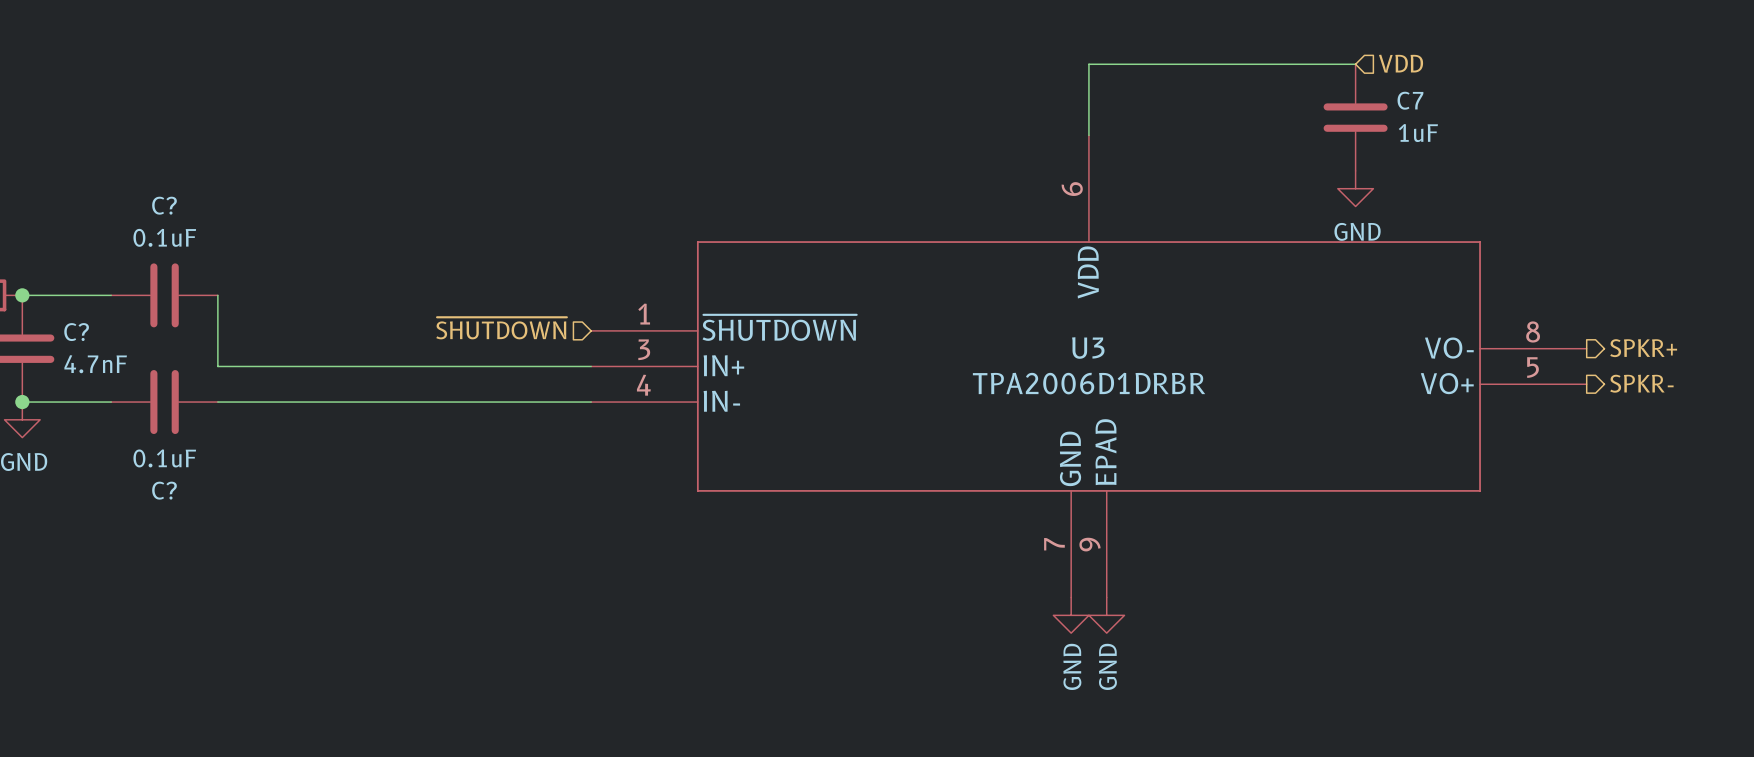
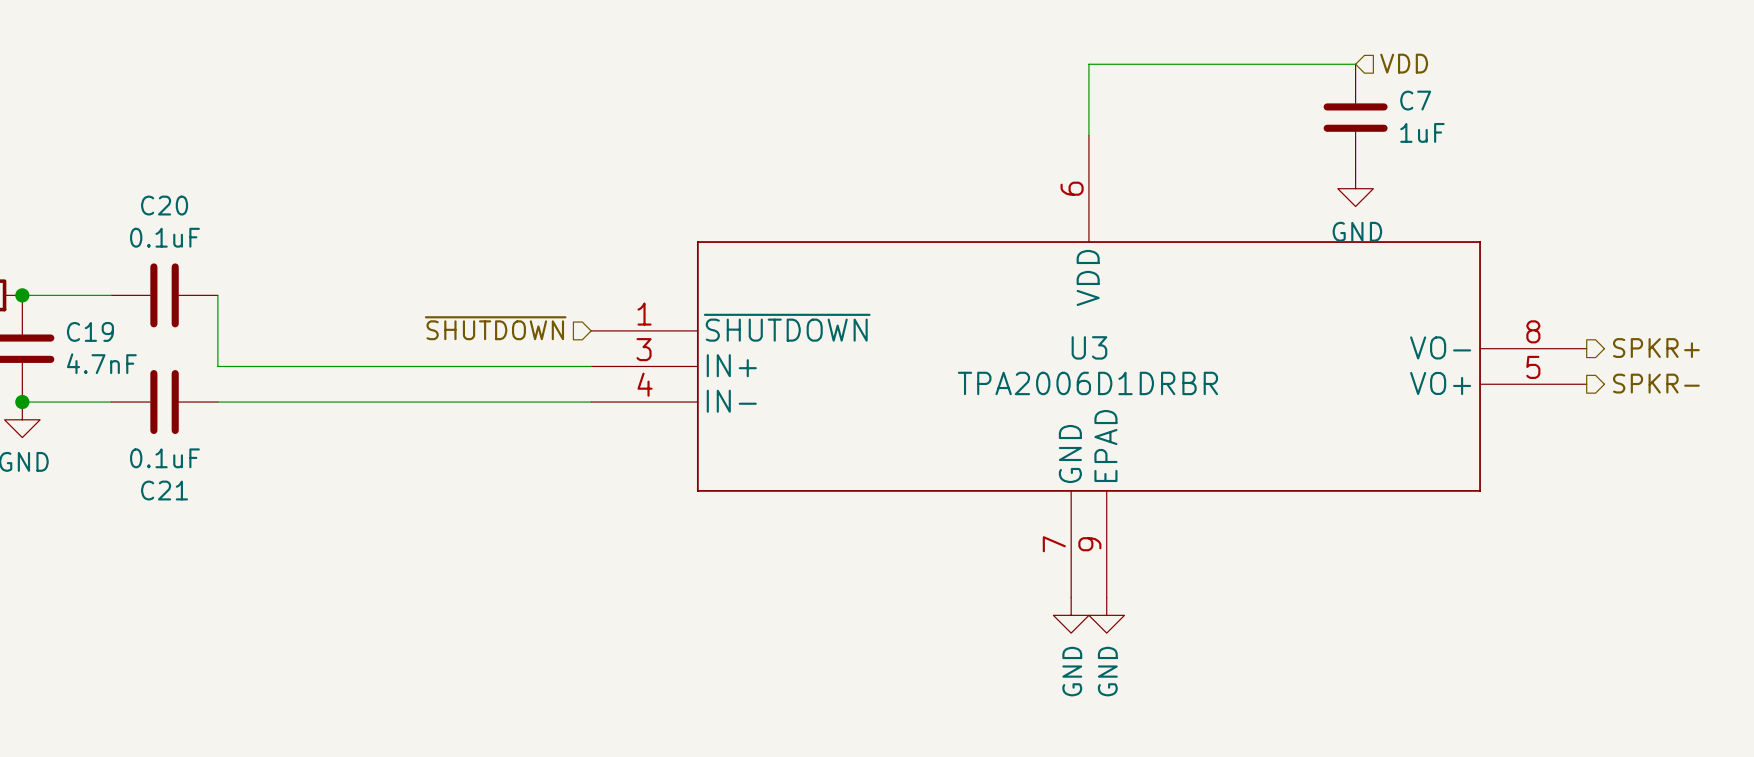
C? name: C? (164, 205) -> C20 (164, 205)
C? name: C? (76, 332) -> C19 (90, 331)
C? name: C? (164, 490) -> C21 (164, 490)

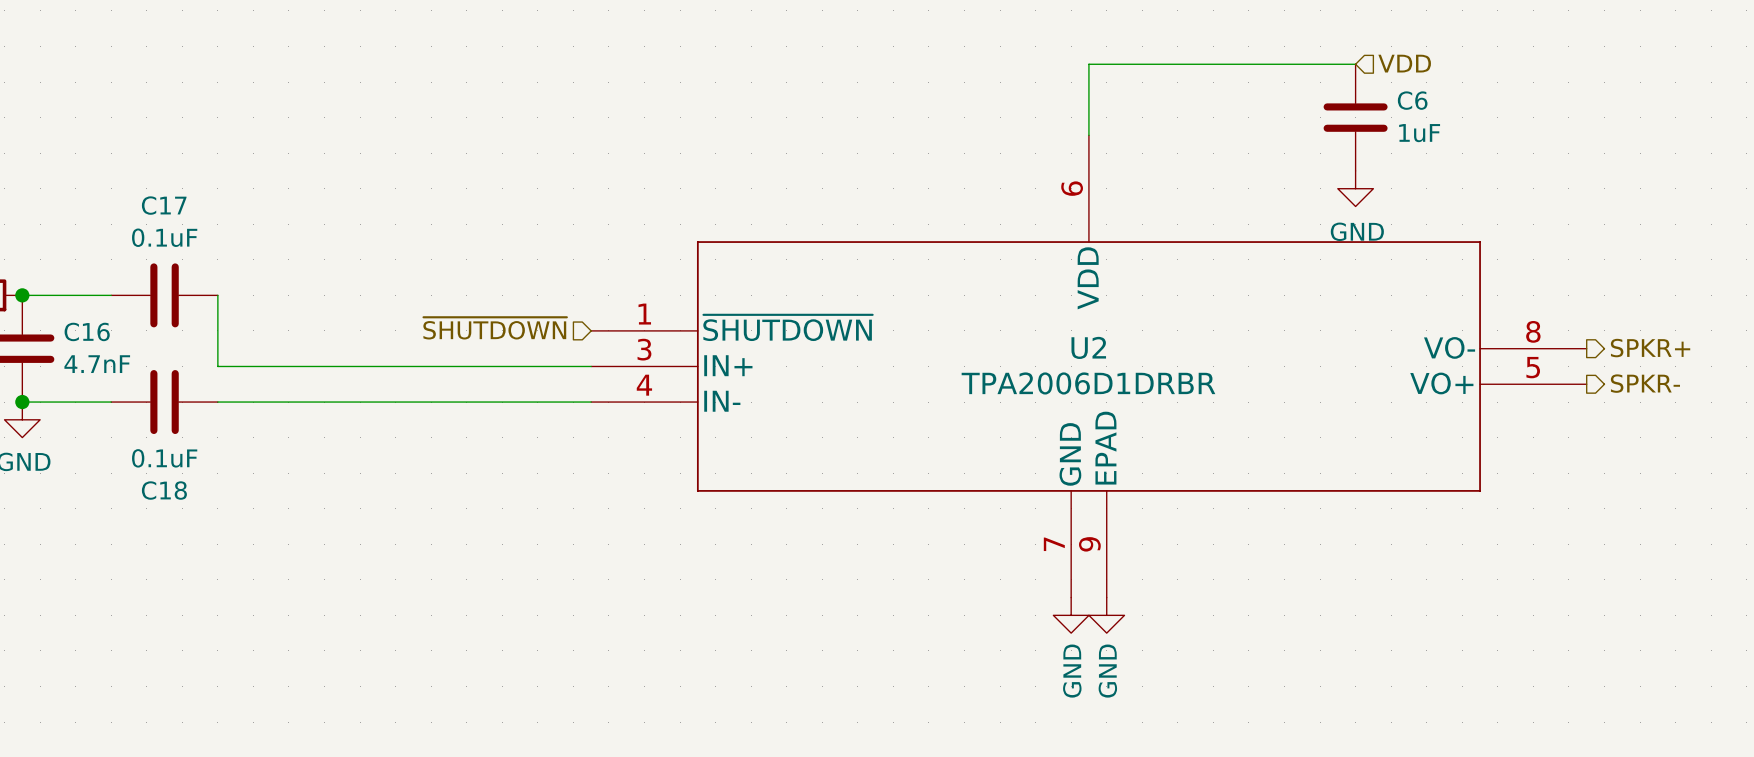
C7 name: C7 (1415, 100) -> C6 (1412, 100)
C20 name: C20 (164, 205) -> C17 (164, 205)
C19 name: C19 (90, 331) -> C16 (87, 331)
U3 name: U3 (1089, 347) -> U2 (1088, 347)
C21 name: C21 (164, 490) -> C18 (164, 490)

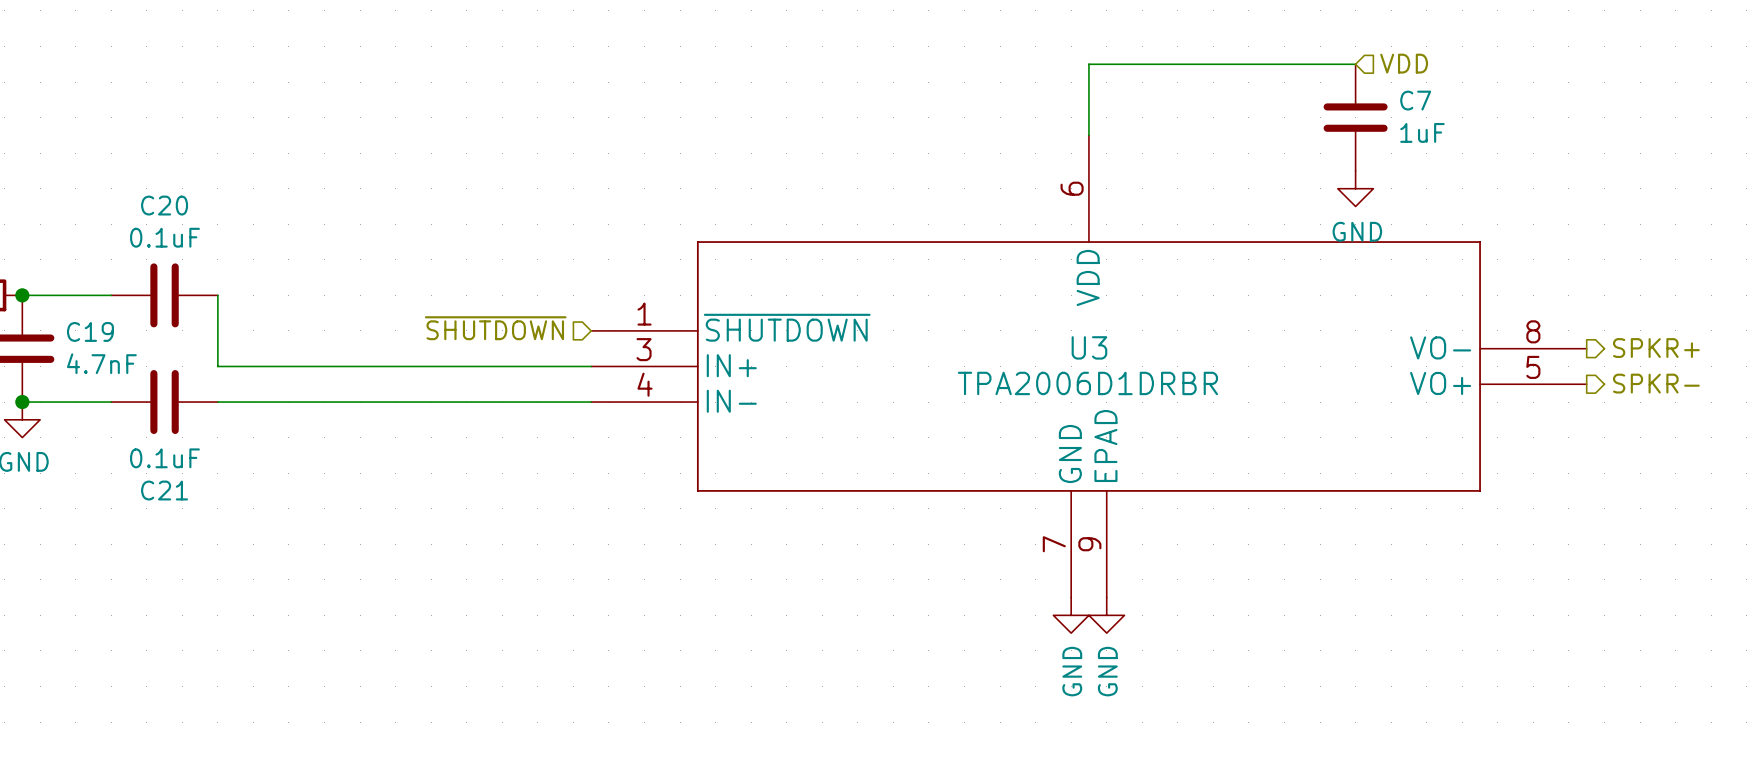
C6 name: C6 (1412, 100) -> C7 (1415, 100)
C17 name: C17 (164, 205) -> C20 (164, 205)
C16 name: C16 (87, 331) -> C19 (90, 331)
U2 name: U2 (1088, 347) -> U3 (1089, 347)
C18 name: C18 (164, 490) -> C21 (164, 490)

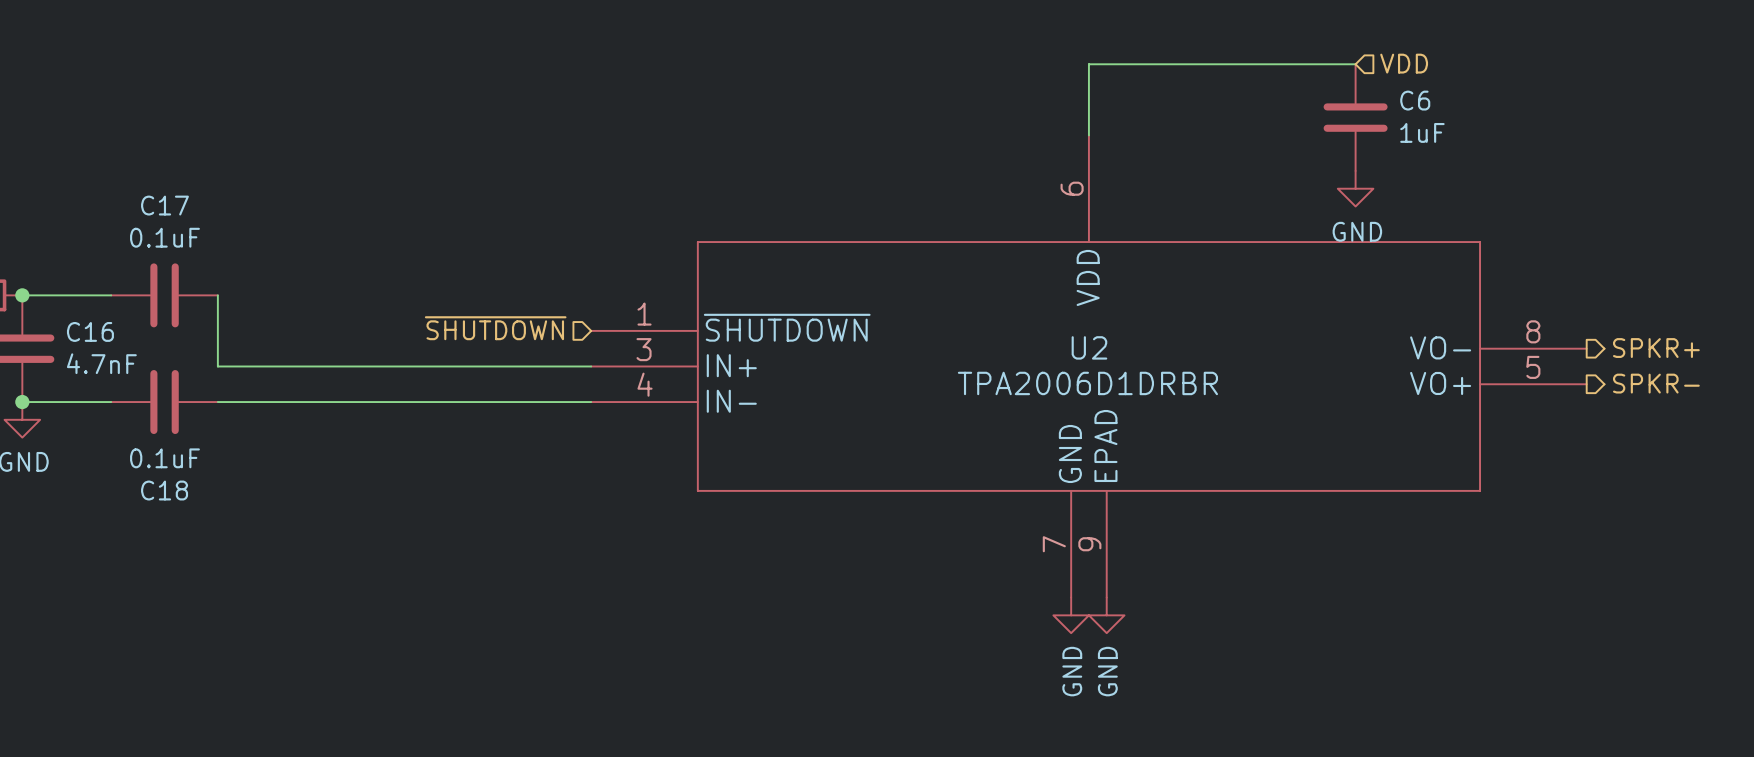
C7 name: C7 (1415, 100) -> C6 (1415, 100)
C20 name: C20 (164, 205) -> C17 (164, 205)
C19 name: C19 (90, 331) -> C16 (90, 331)
U3 name: U3 (1089, 347) -> U2 (1089, 347)
C21 name: C21 (164, 490) -> C18 (164, 490)

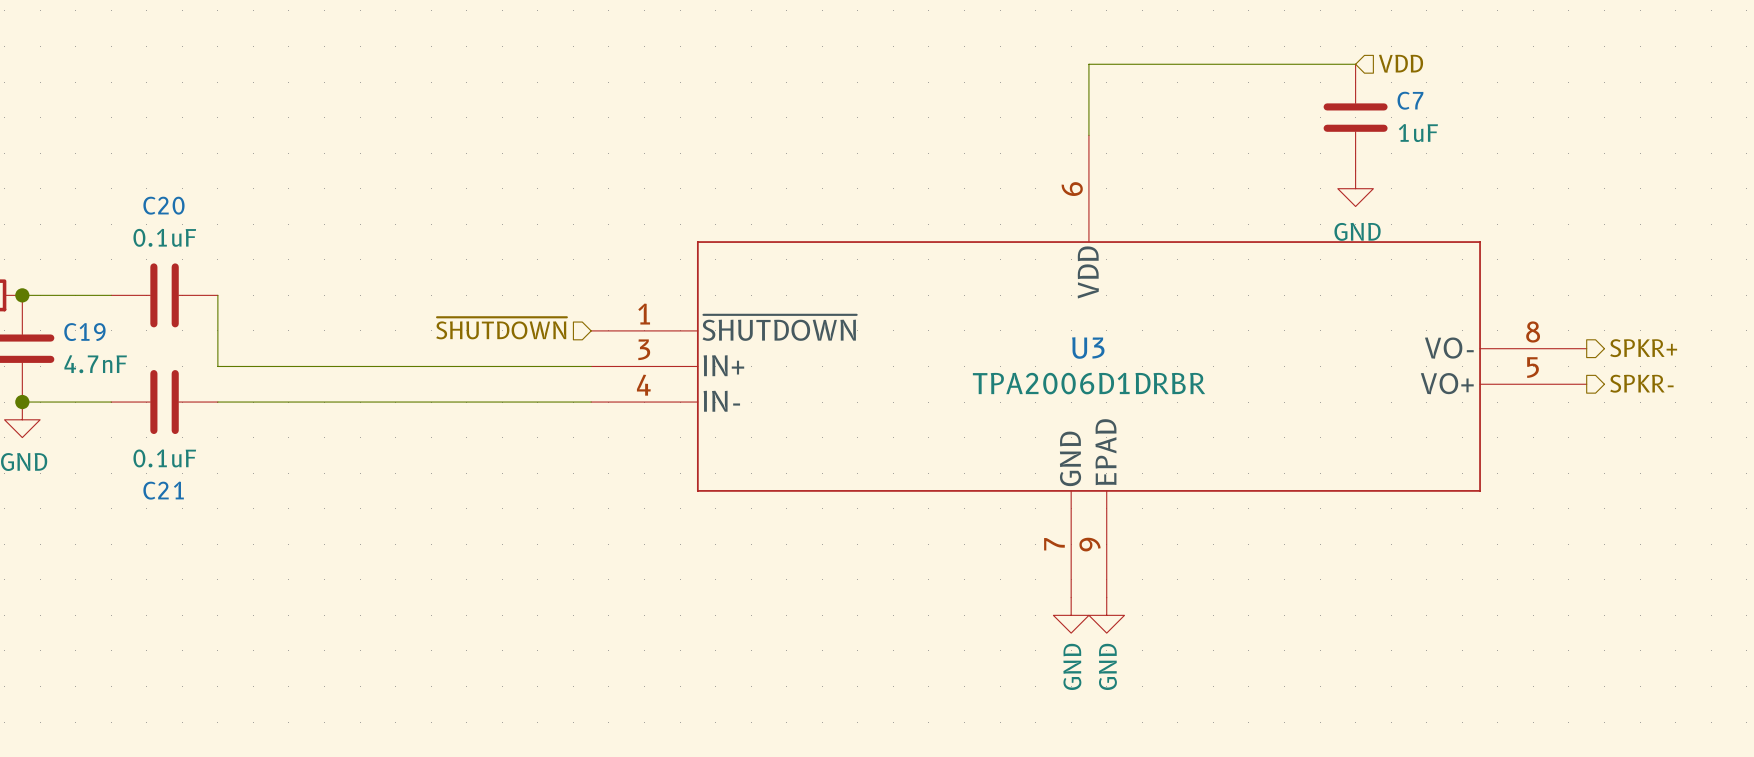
C6 name: C6 (1415, 100) -> C7 (1410, 100)
C17 name: C17 (164, 205) -> C20 (163, 205)
C16 name: C16 (90, 331) -> C19 (84, 332)
U2 name: U2 (1089, 347) -> U3 (1088, 348)
C18 name: C18 (164, 490) -> C21 (163, 490)

